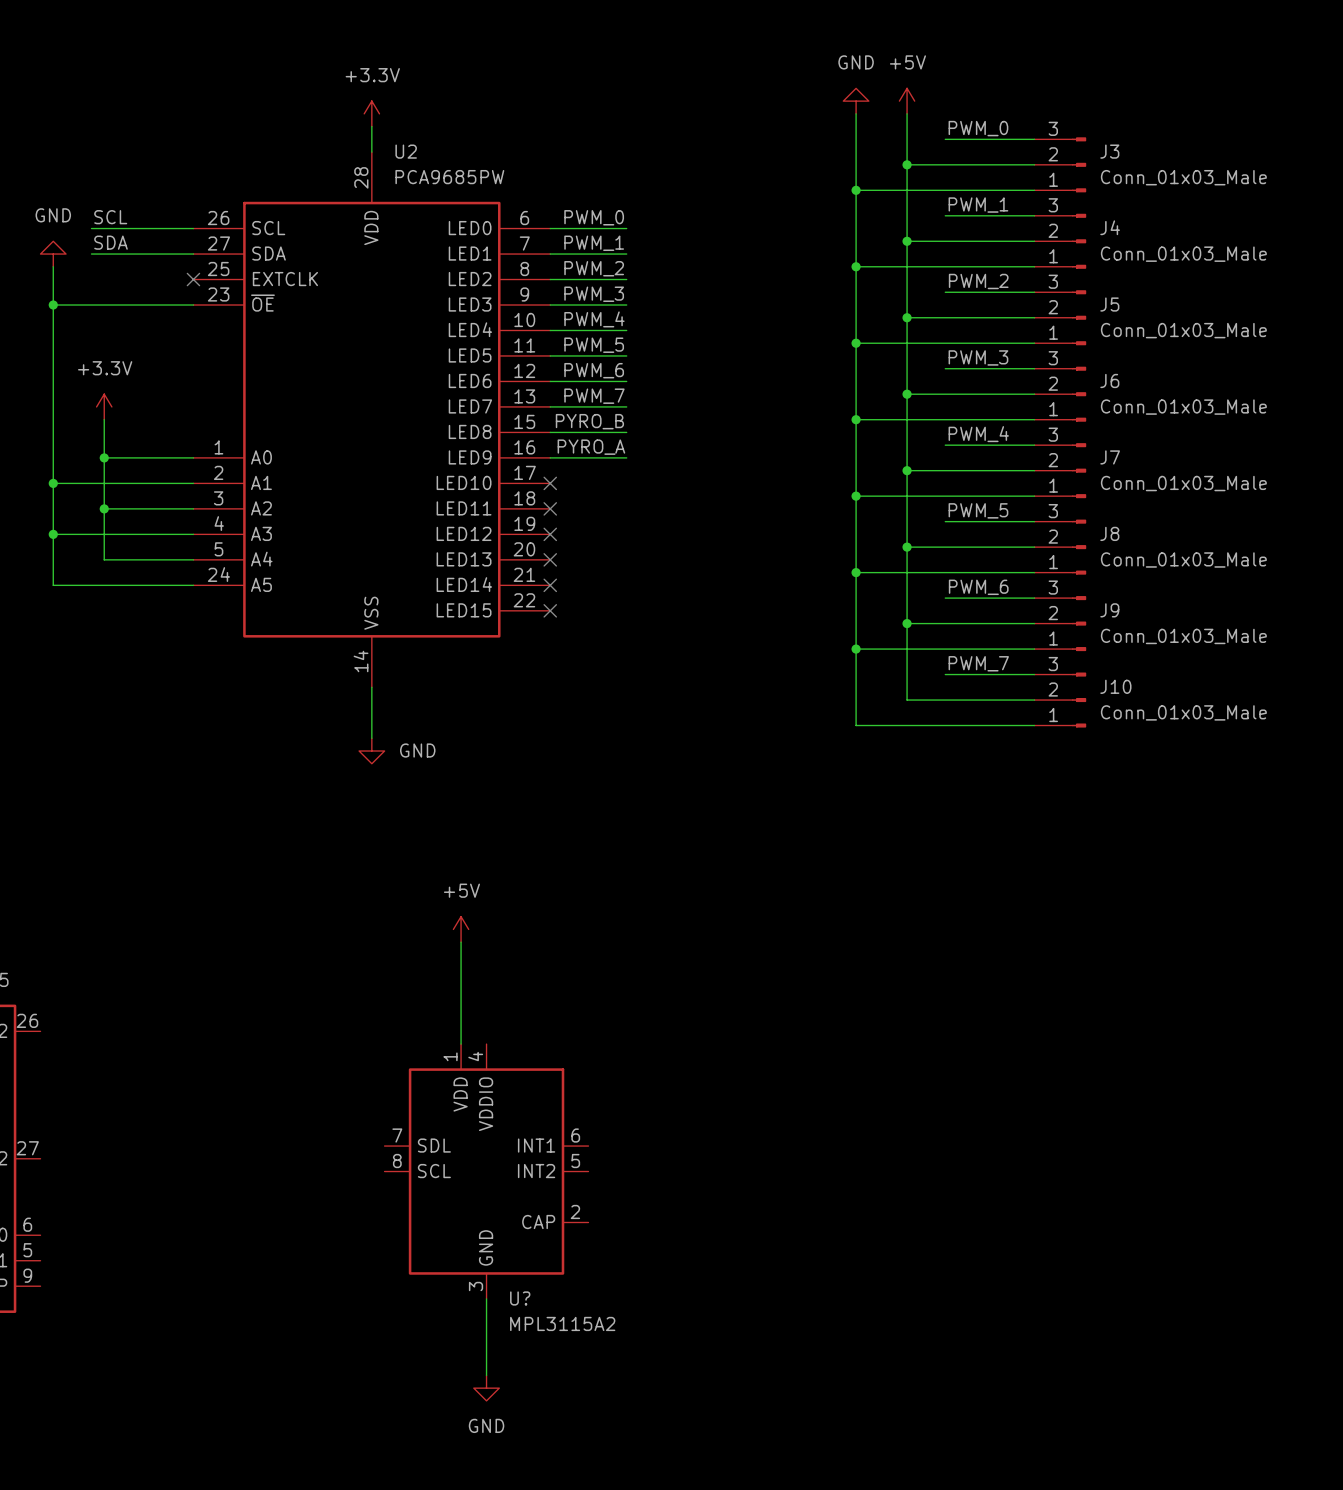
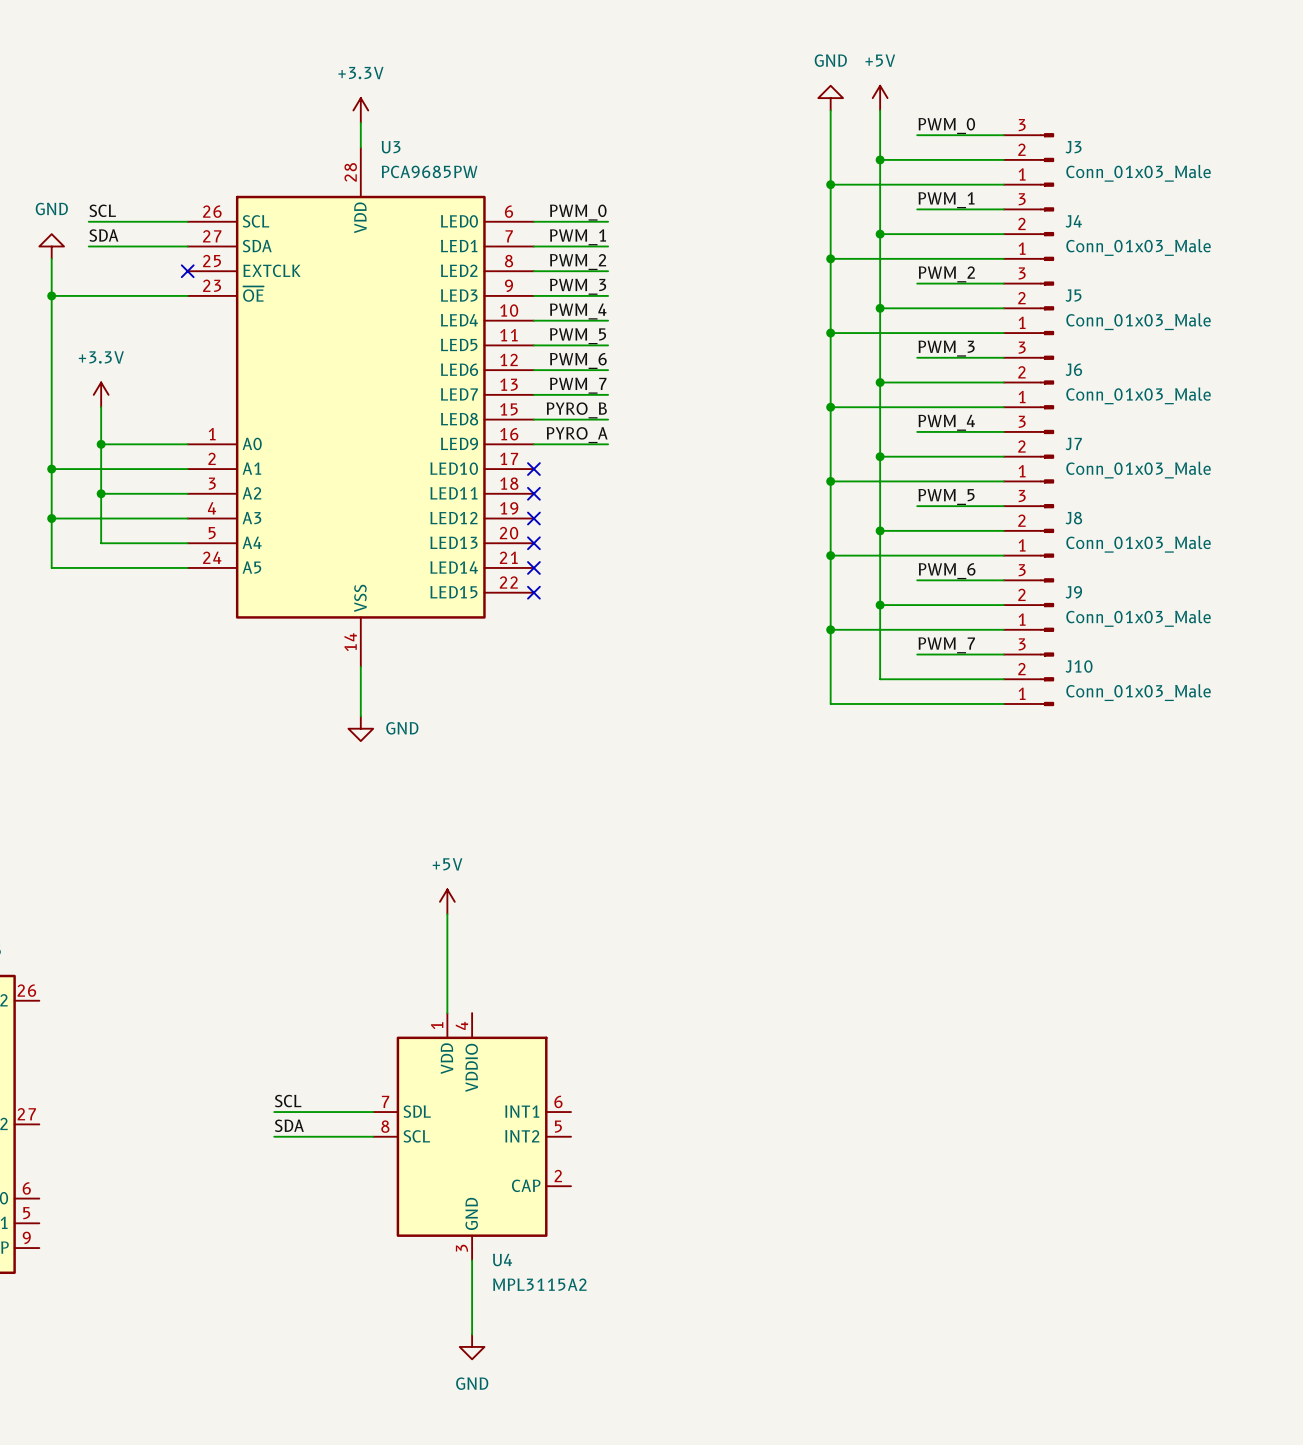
U2 name: U2 (406, 151) -> U3 (391, 147)
label: none -> SCL (288, 1101)
wire: none -> (274, 1112) (373, 1112)
label: none -> SDA (289, 1125)
wire: none -> (274, 1136) (373, 1136)
U? name: U? (520, 1298) -> U4 (502, 1260)

